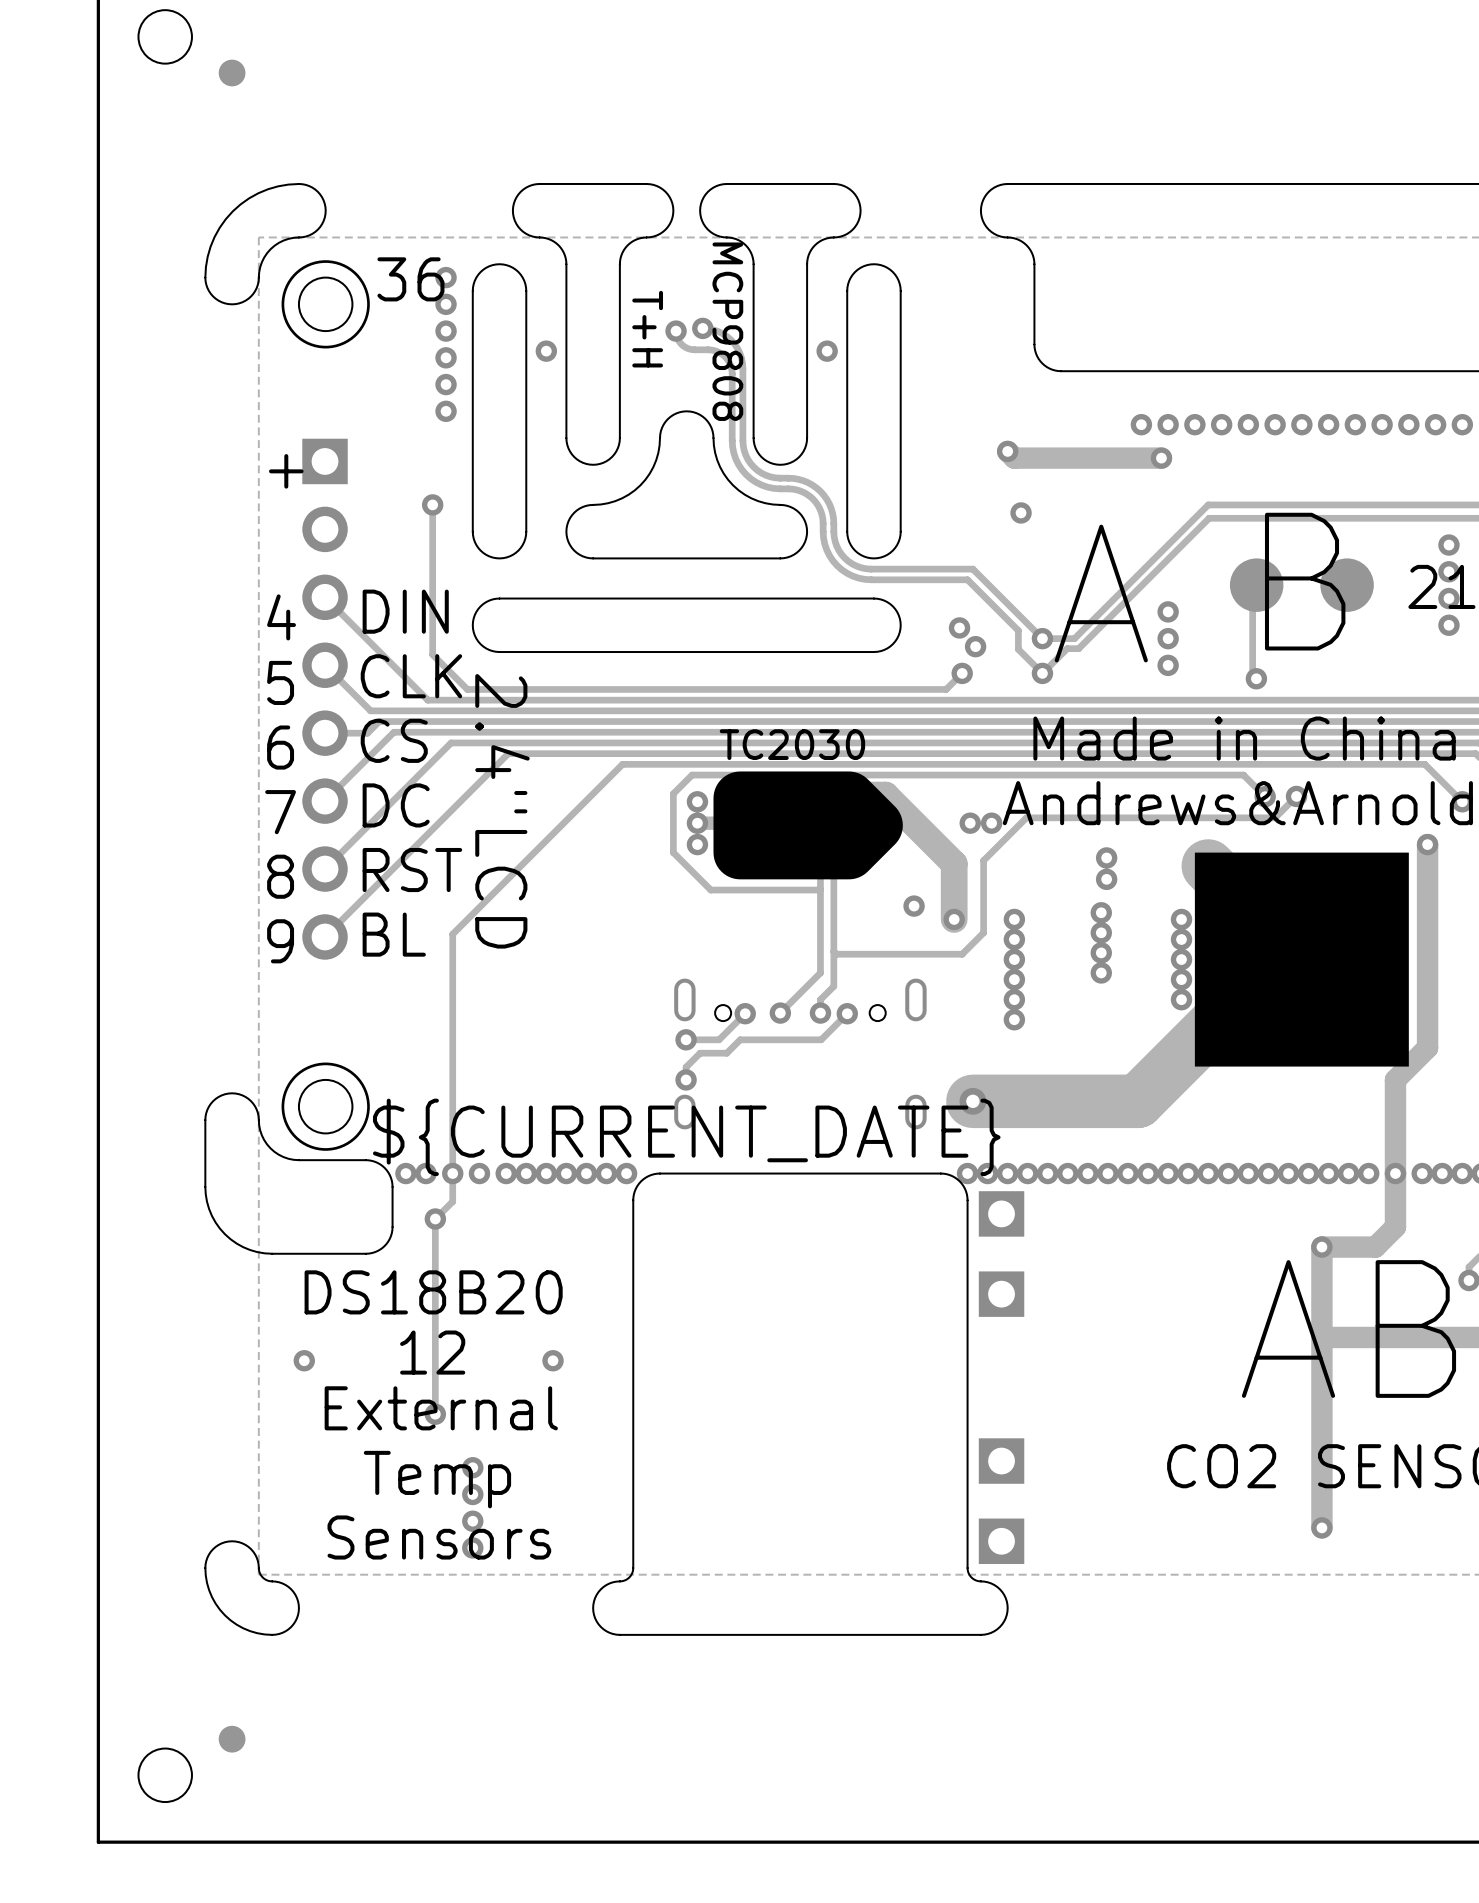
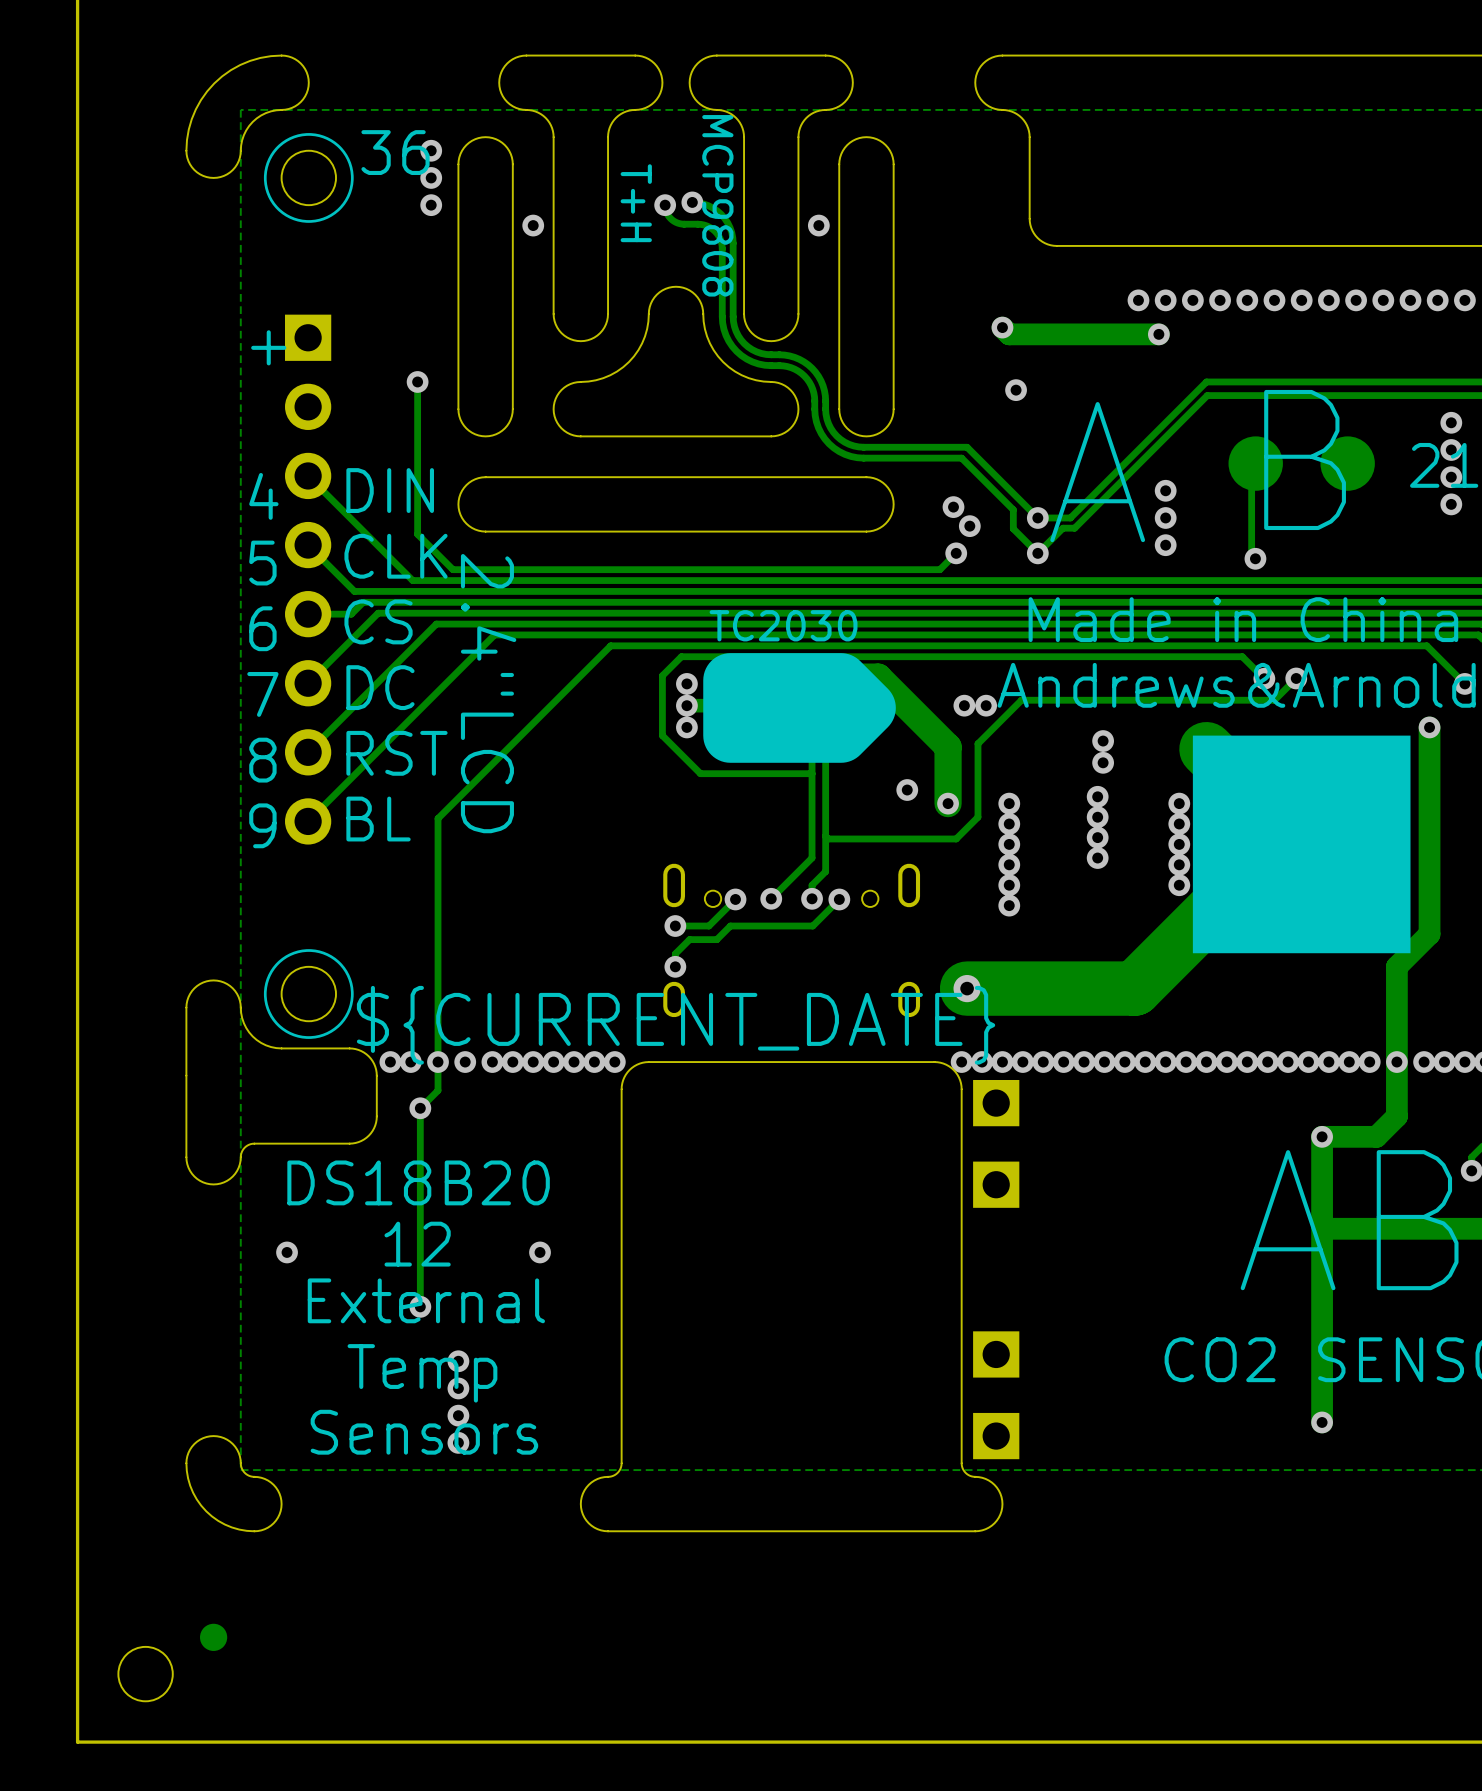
via: (446, 357) -> none
via: (446, 384) -> none
via: (446, 411) -> none
board edge: (205, 1186) (207, 1201) (211, 1215) (224, 1234) (243, 1247) (257, 1252) (272, 1253) -> (186, 1075) (186, 1160) (194, 1176) (210, 1184) (227, 1180) (237, 1170) (243, 1148) (254, 1143)

